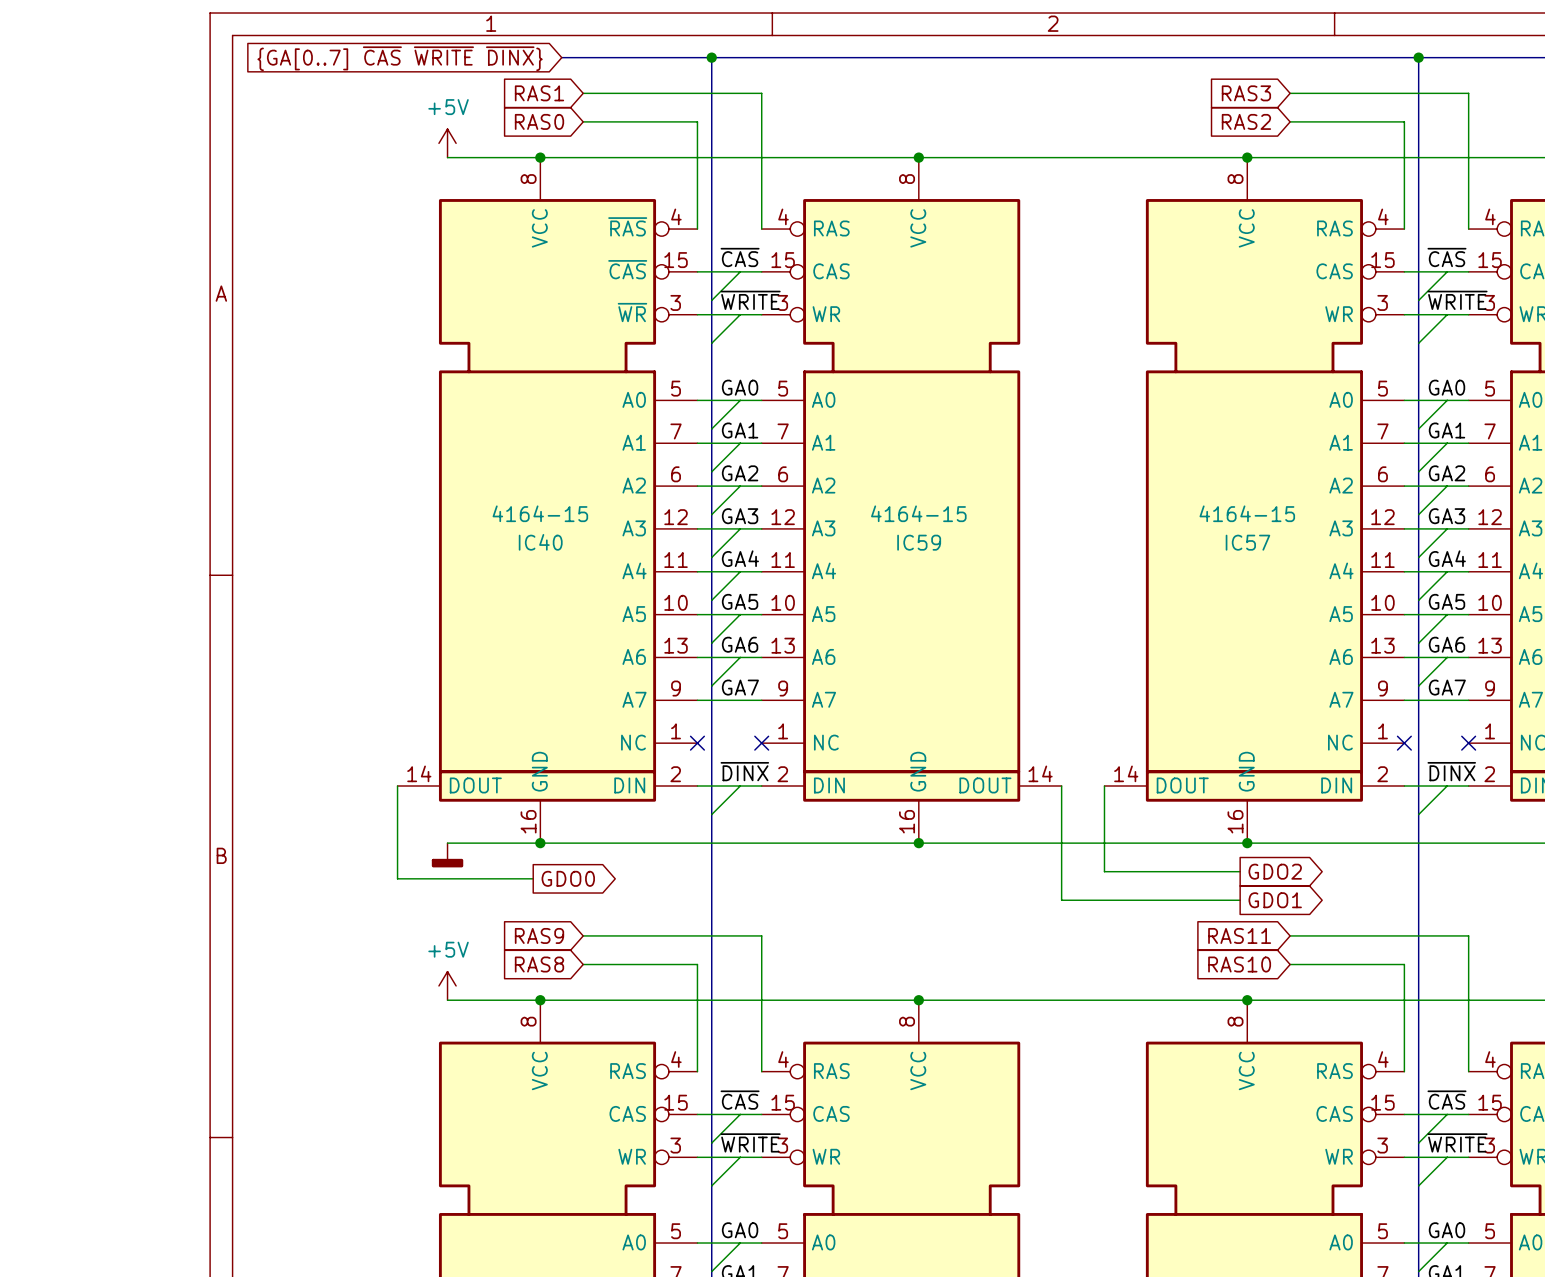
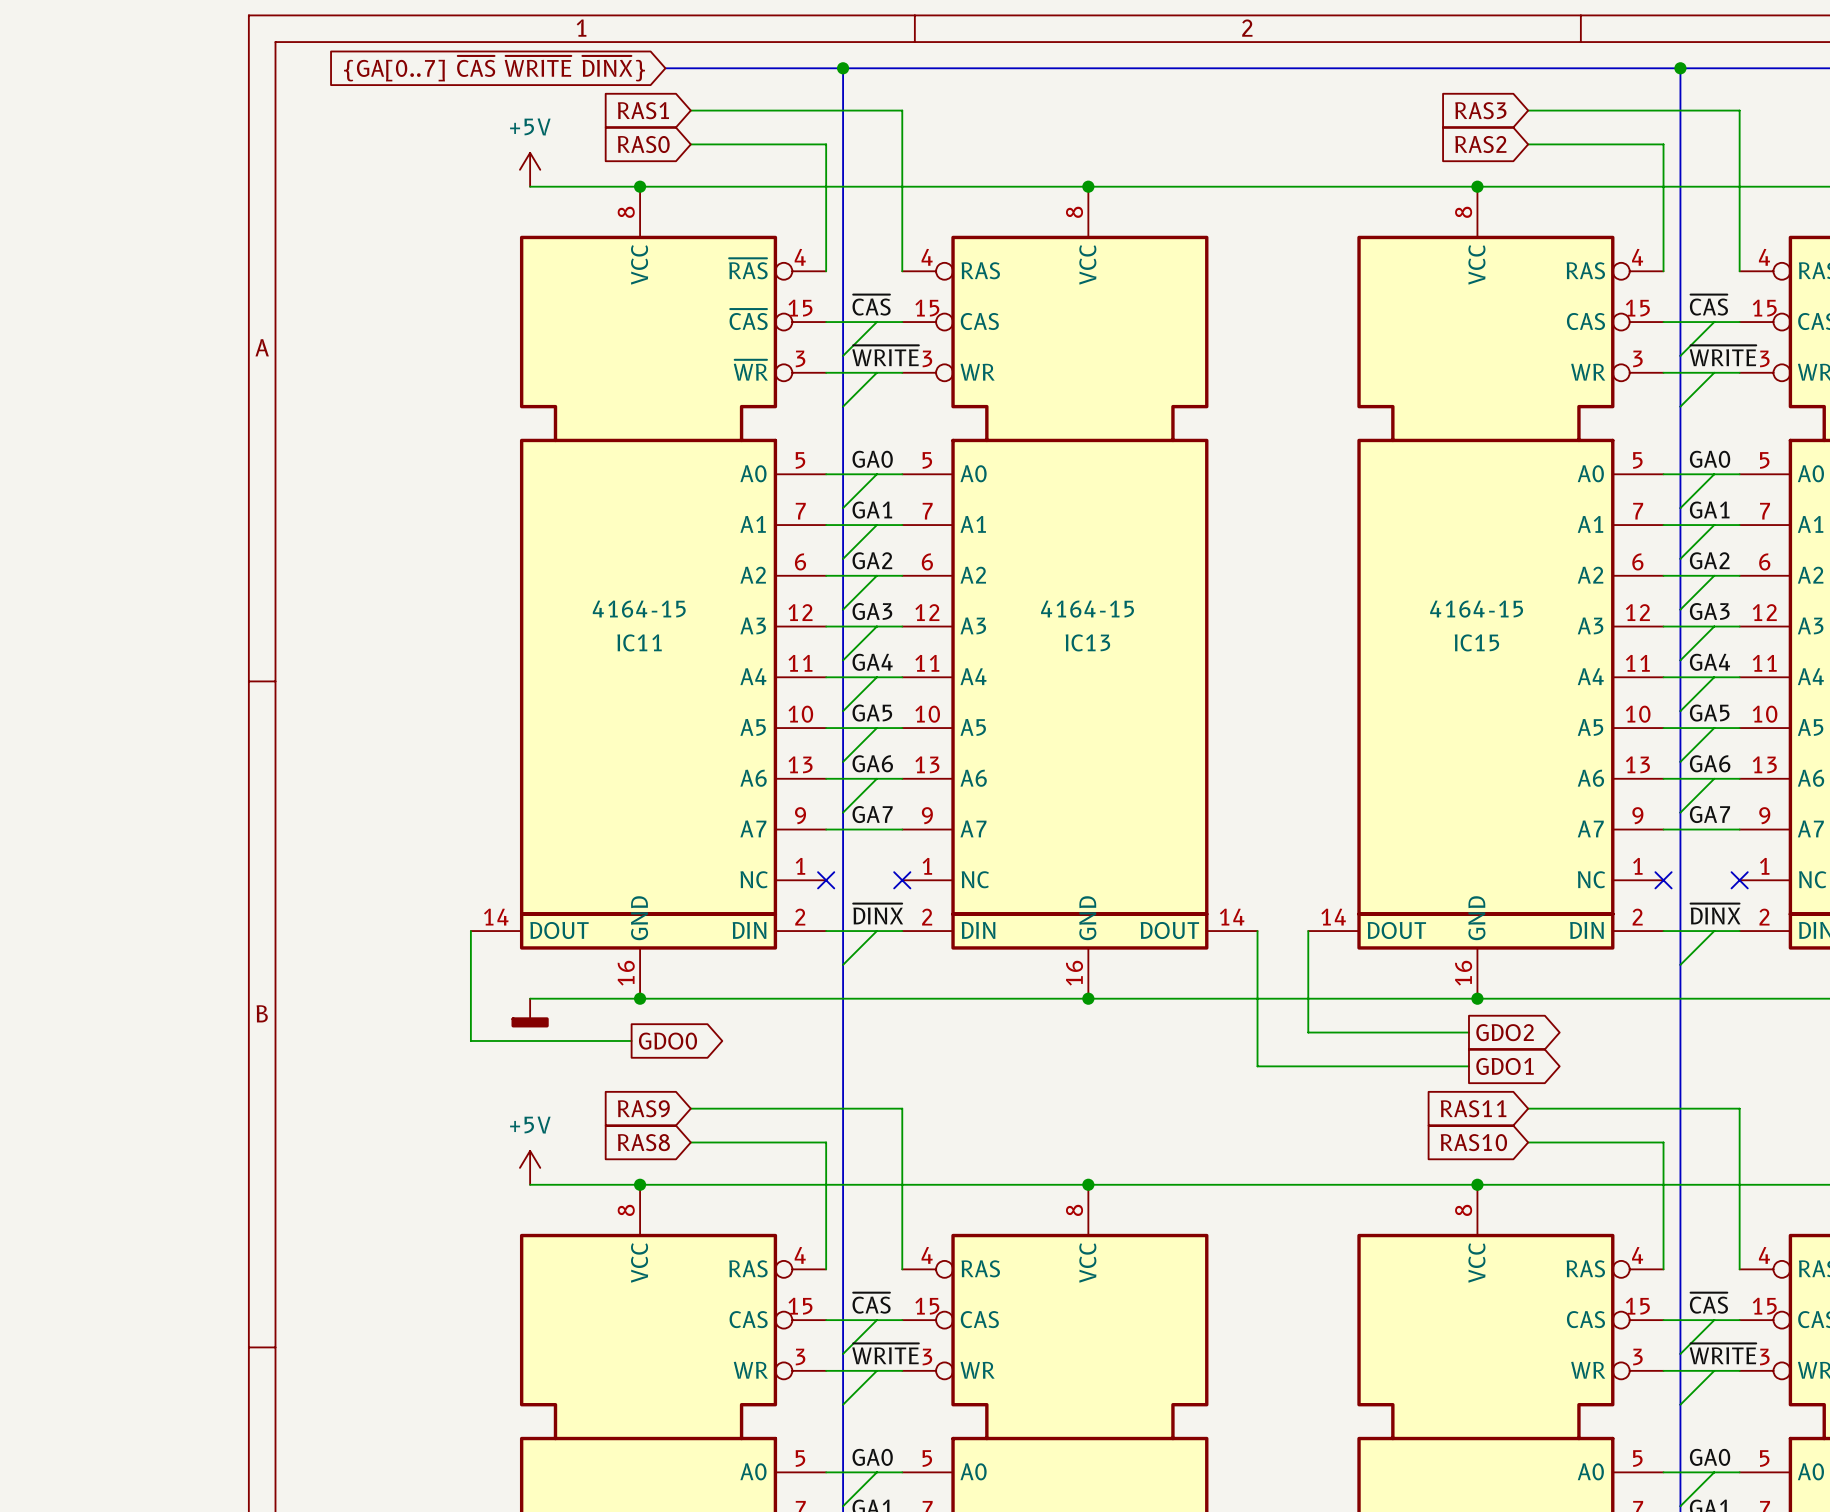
IC40 name: IC40 (540, 542) -> IC11 (639, 642)
IC59 name: IC59 (919, 542) -> IC13 (1087, 642)
IC57 name: IC57 (1247, 542) -> IC15 (1476, 642)

